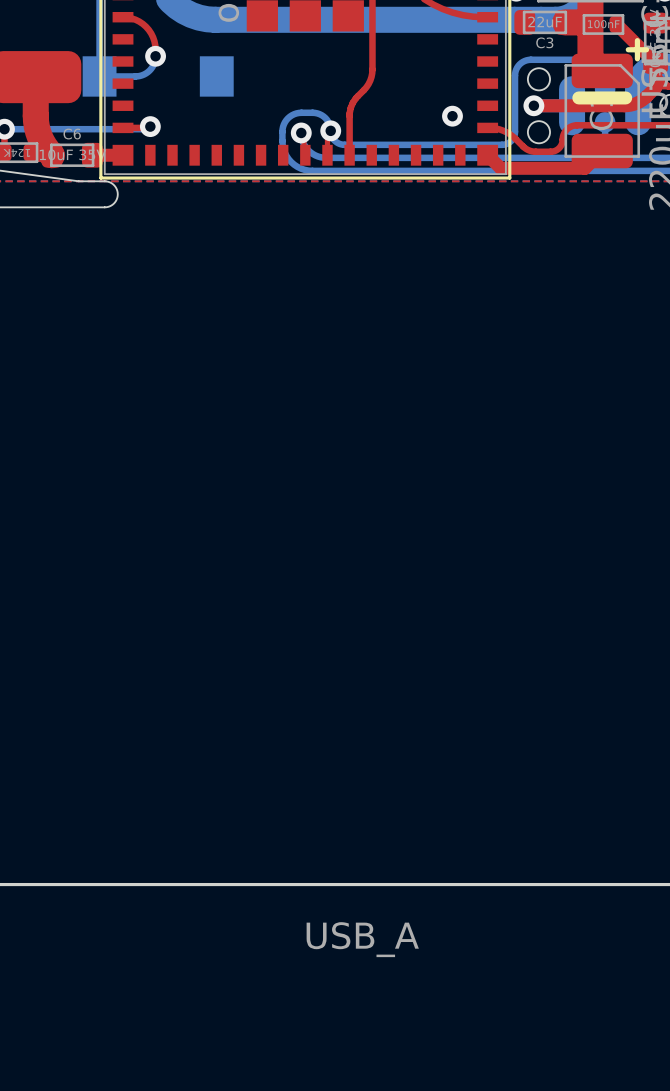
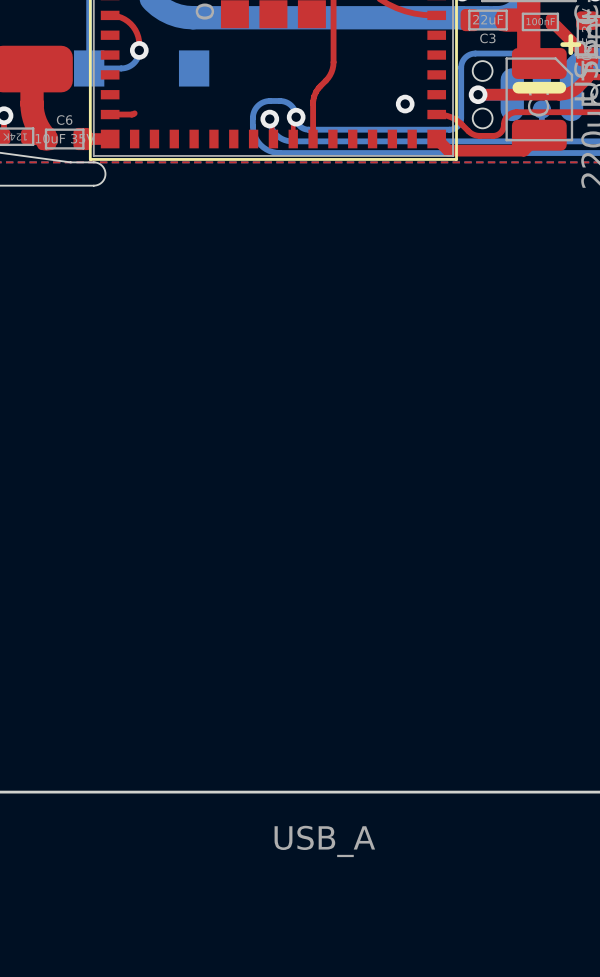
bottom track: (150, 126) (144, 129) (4, 129) -> none
via: (150, 126) -> none

